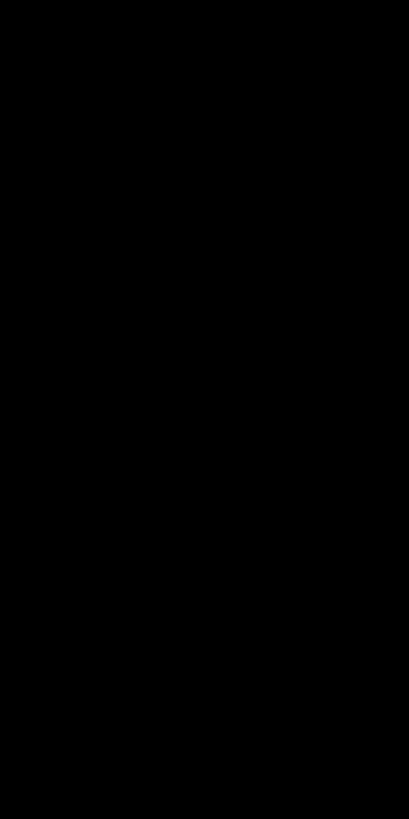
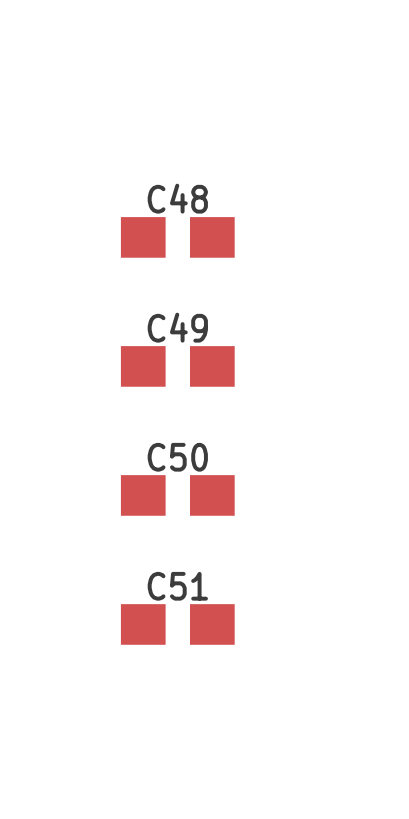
C48: none -> (177, 237)
C49: none -> (177, 366)
C50: none -> (177, 495)
C51: none -> (177, 624)

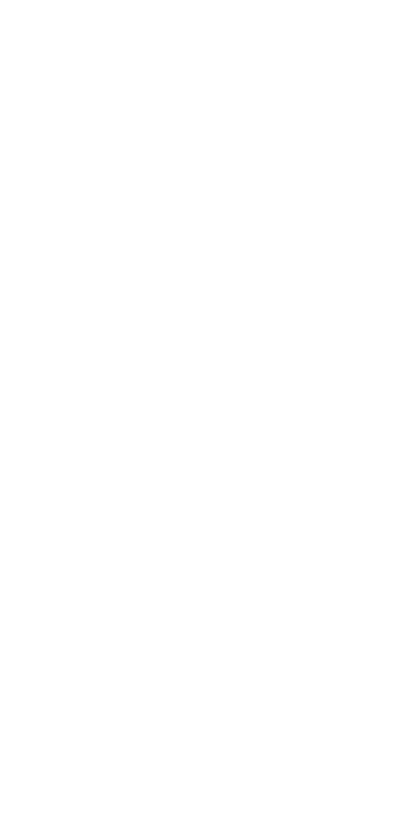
C48: (177, 237) -> none
C49: (177, 366) -> none
C50: (177, 495) -> none
C51: (177, 624) -> none

